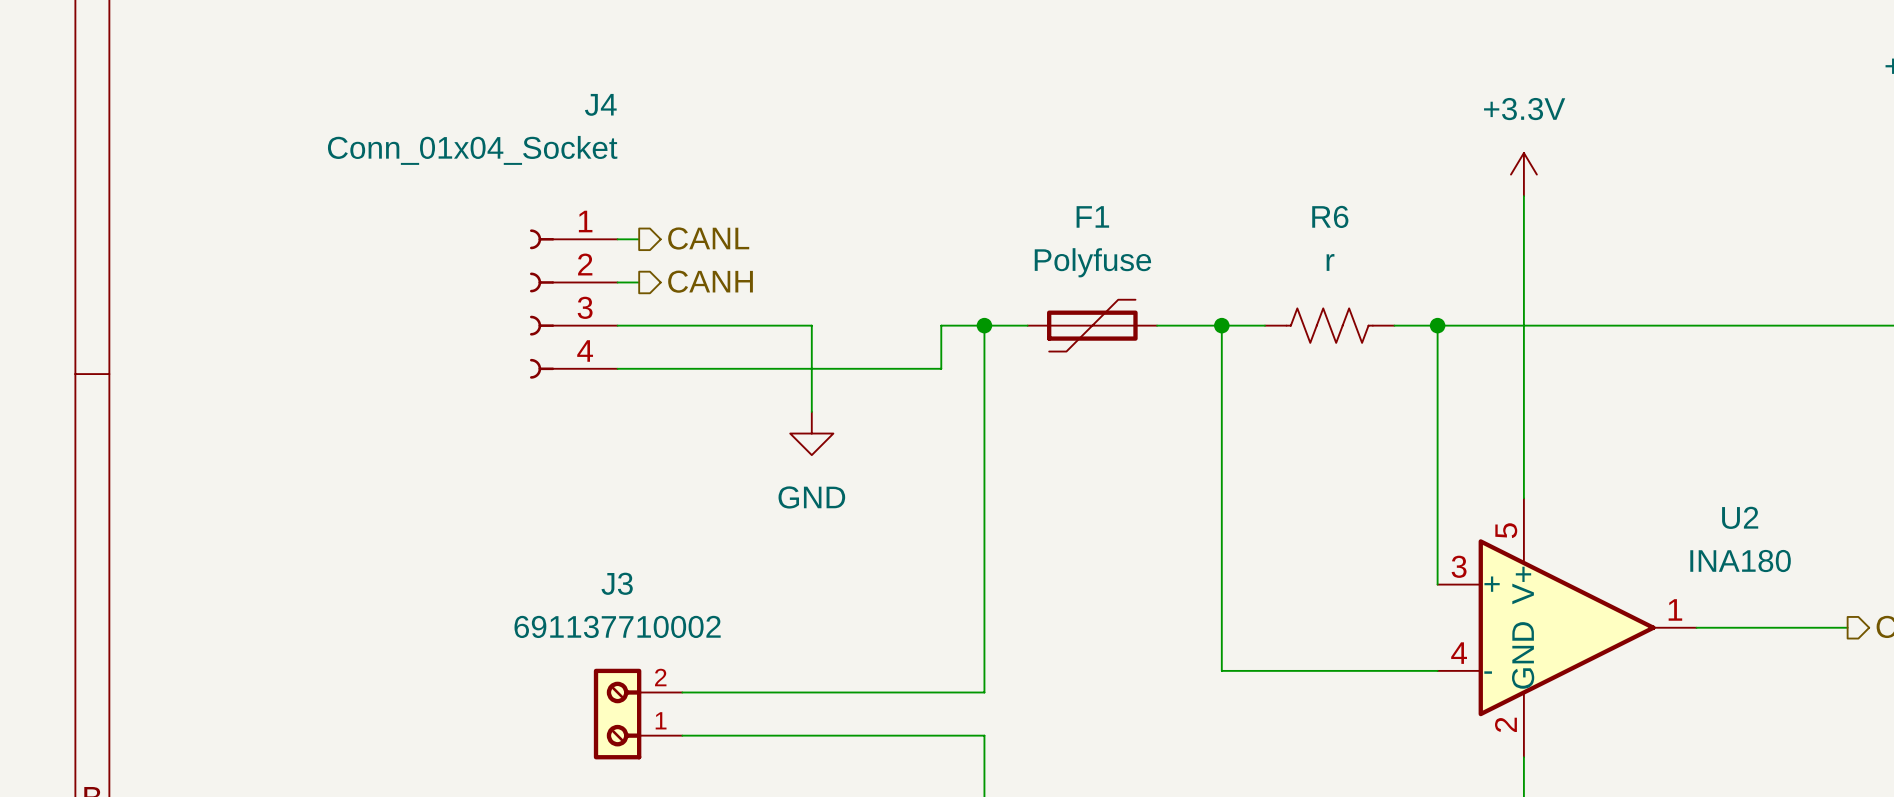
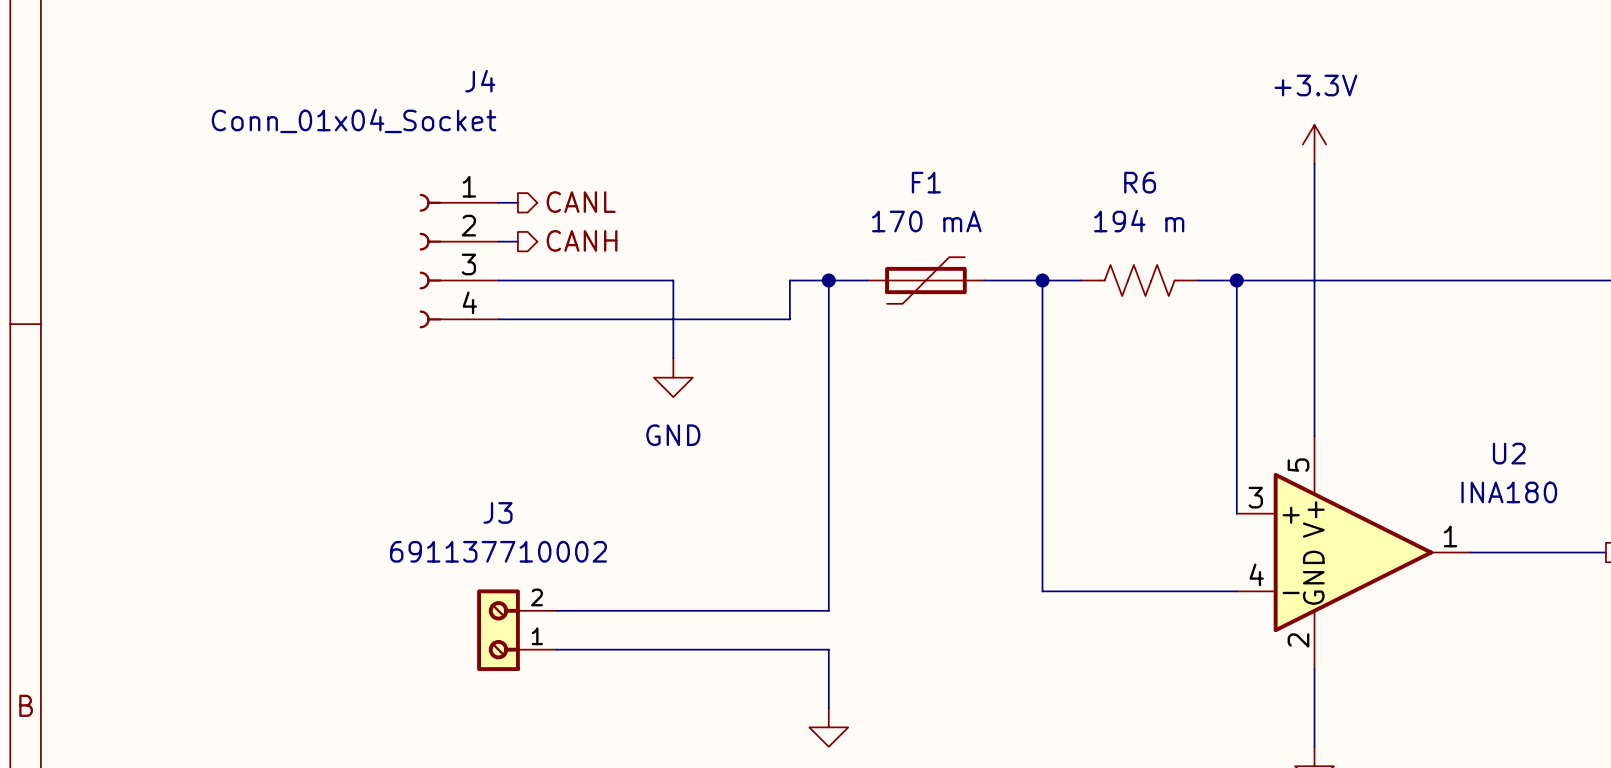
F1 value: Polyfuse (1092, 262) -> 170 mA (926, 221)
R6 value: r (1330, 262) -> 194 m (1139, 221)

